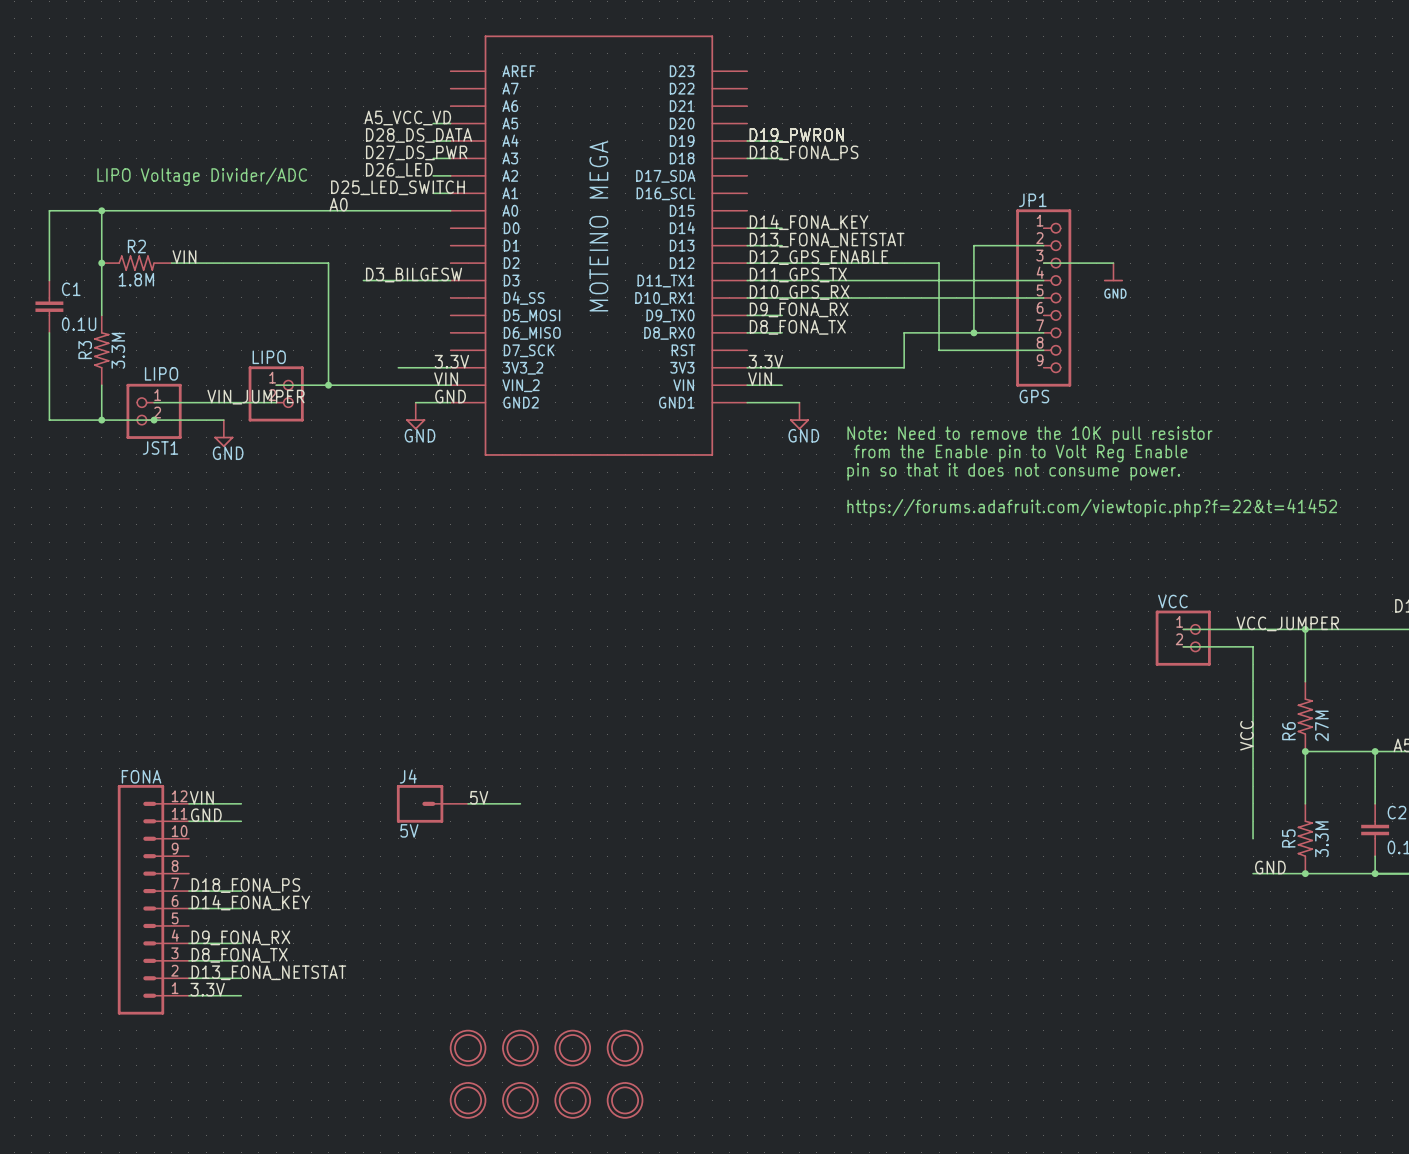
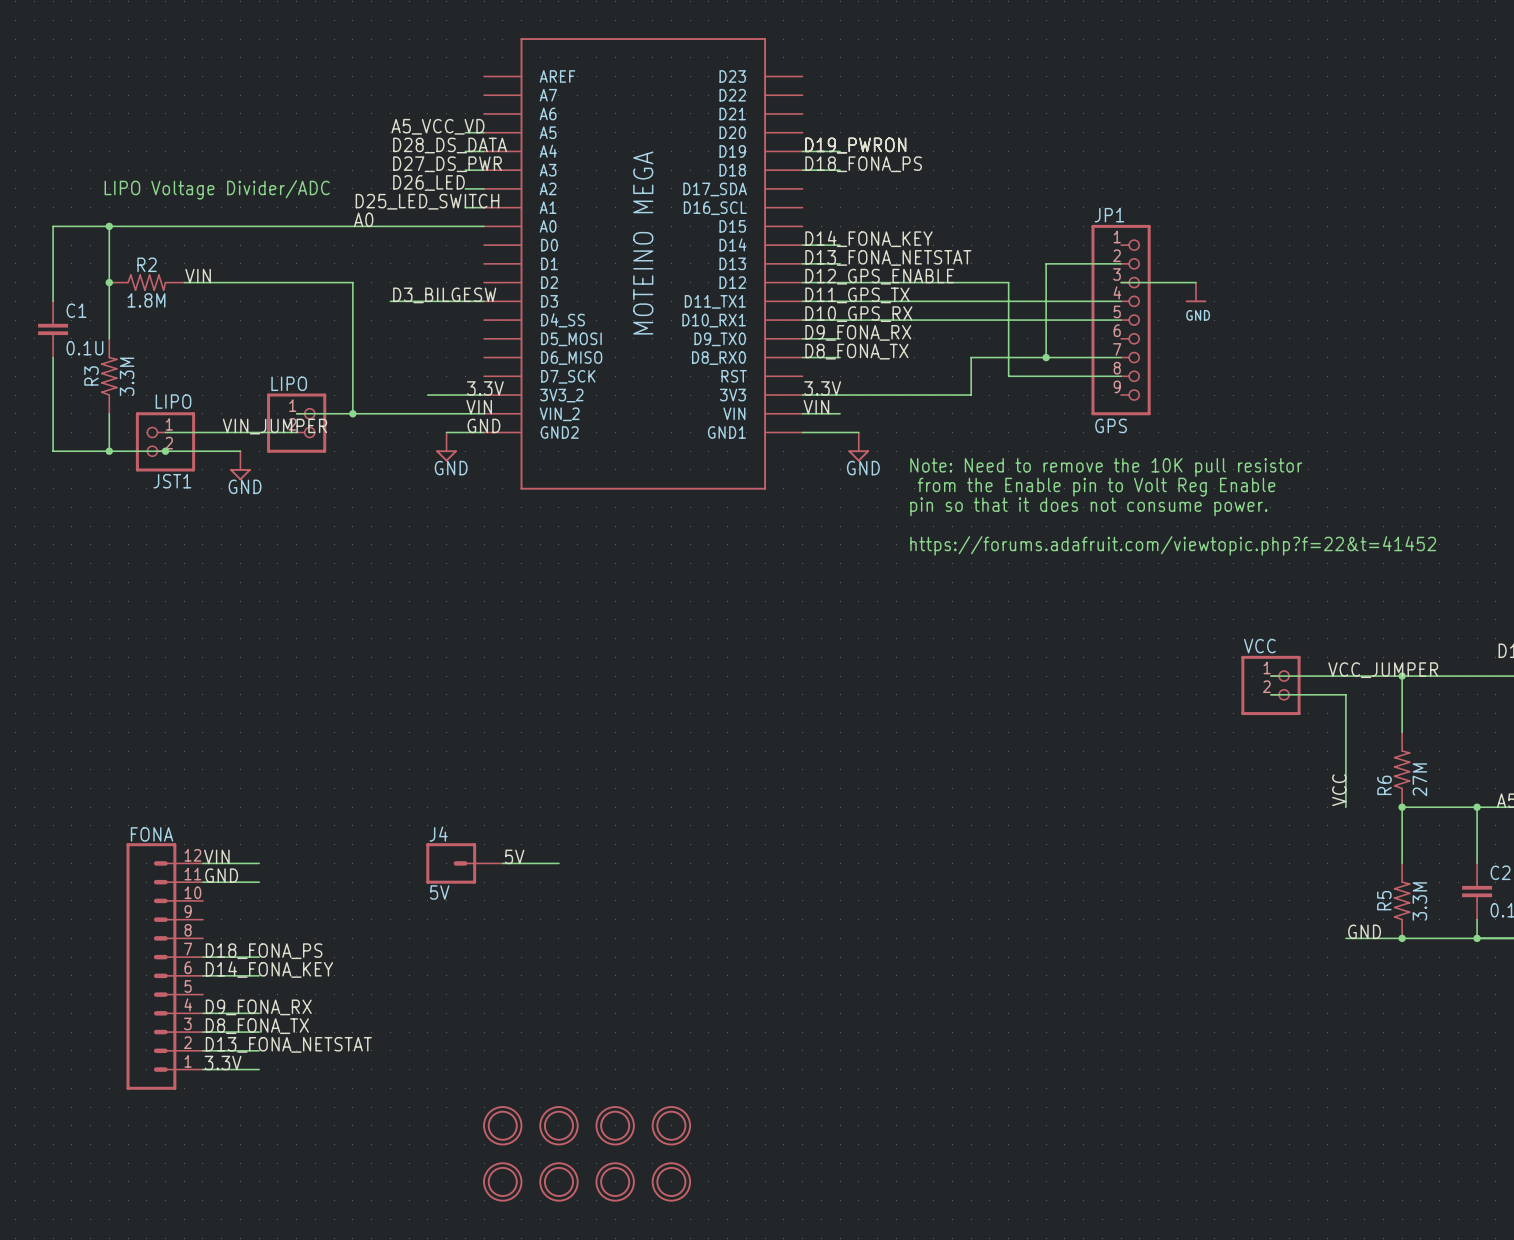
wire: (1253, 751) (1253, 838) -> none

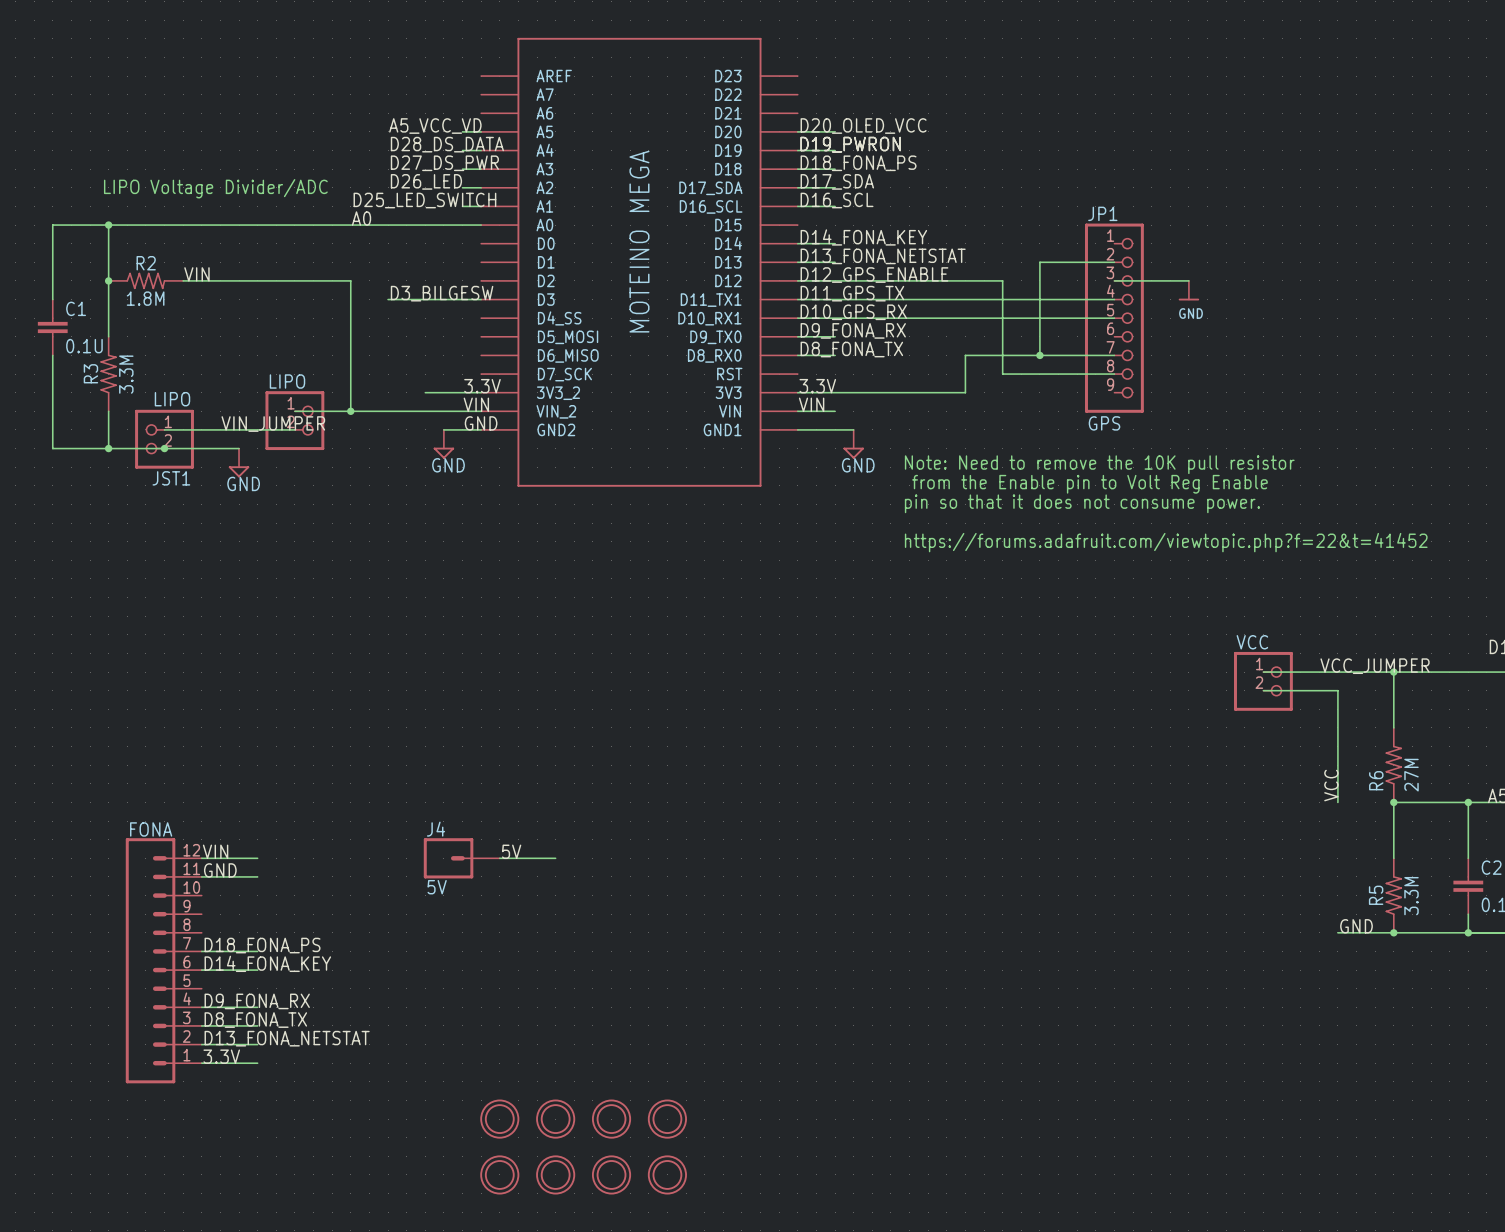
label: none -> D20_OLED_VCC (863, 126)
wire: none -> (797, 131) (835, 131)
label: none -> D17_SDA (837, 181)
wire: none -> (797, 187) (835, 187)
label: none -> D16_SCL (837, 200)
wire: none -> (797, 206) (835, 206)

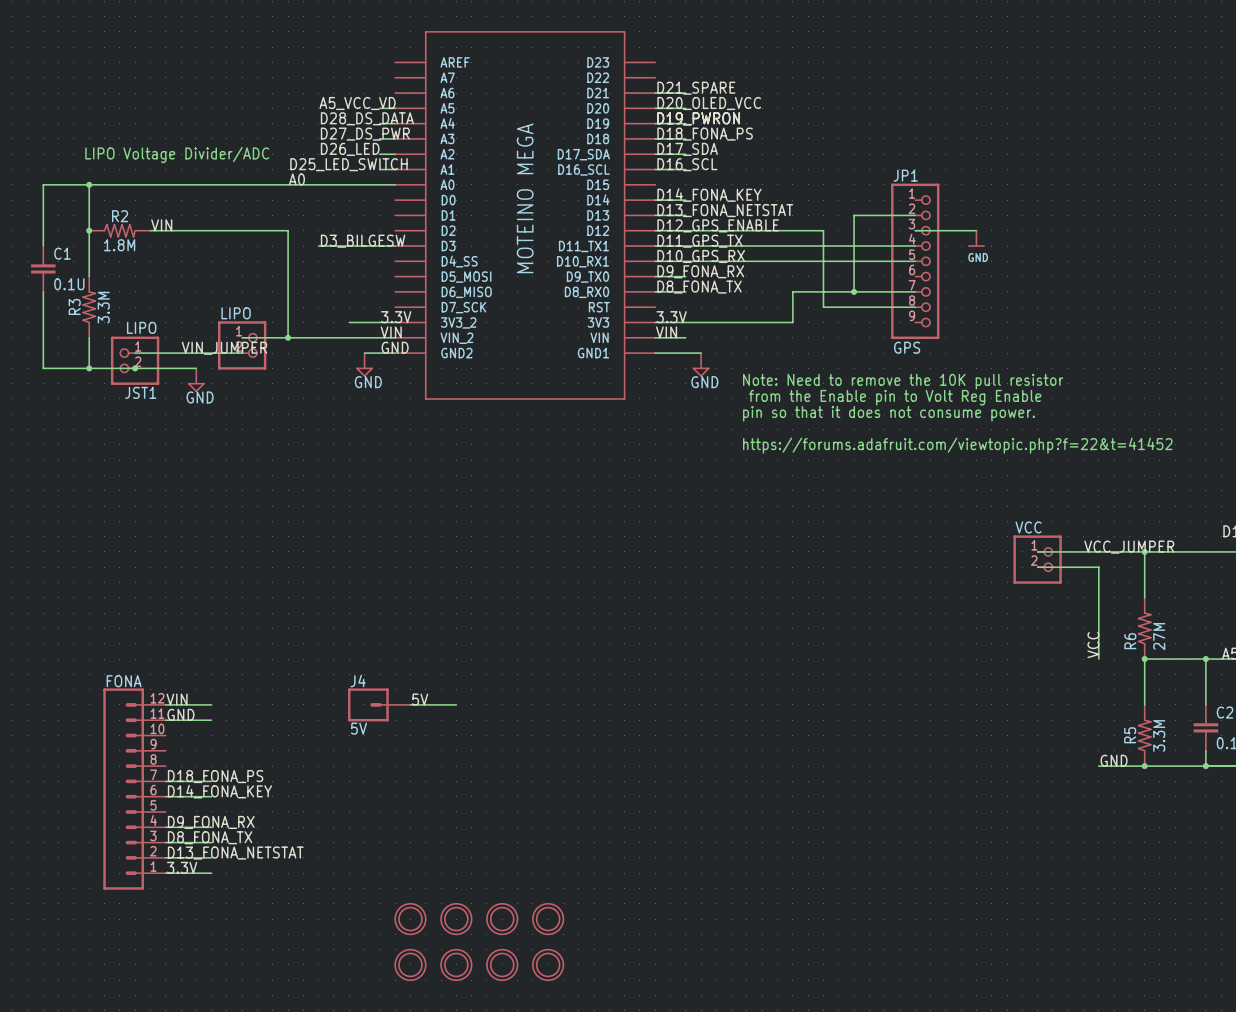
label: none -> D21_SPARE (696, 88)
wire: none -> (655, 93) (685, 93)

